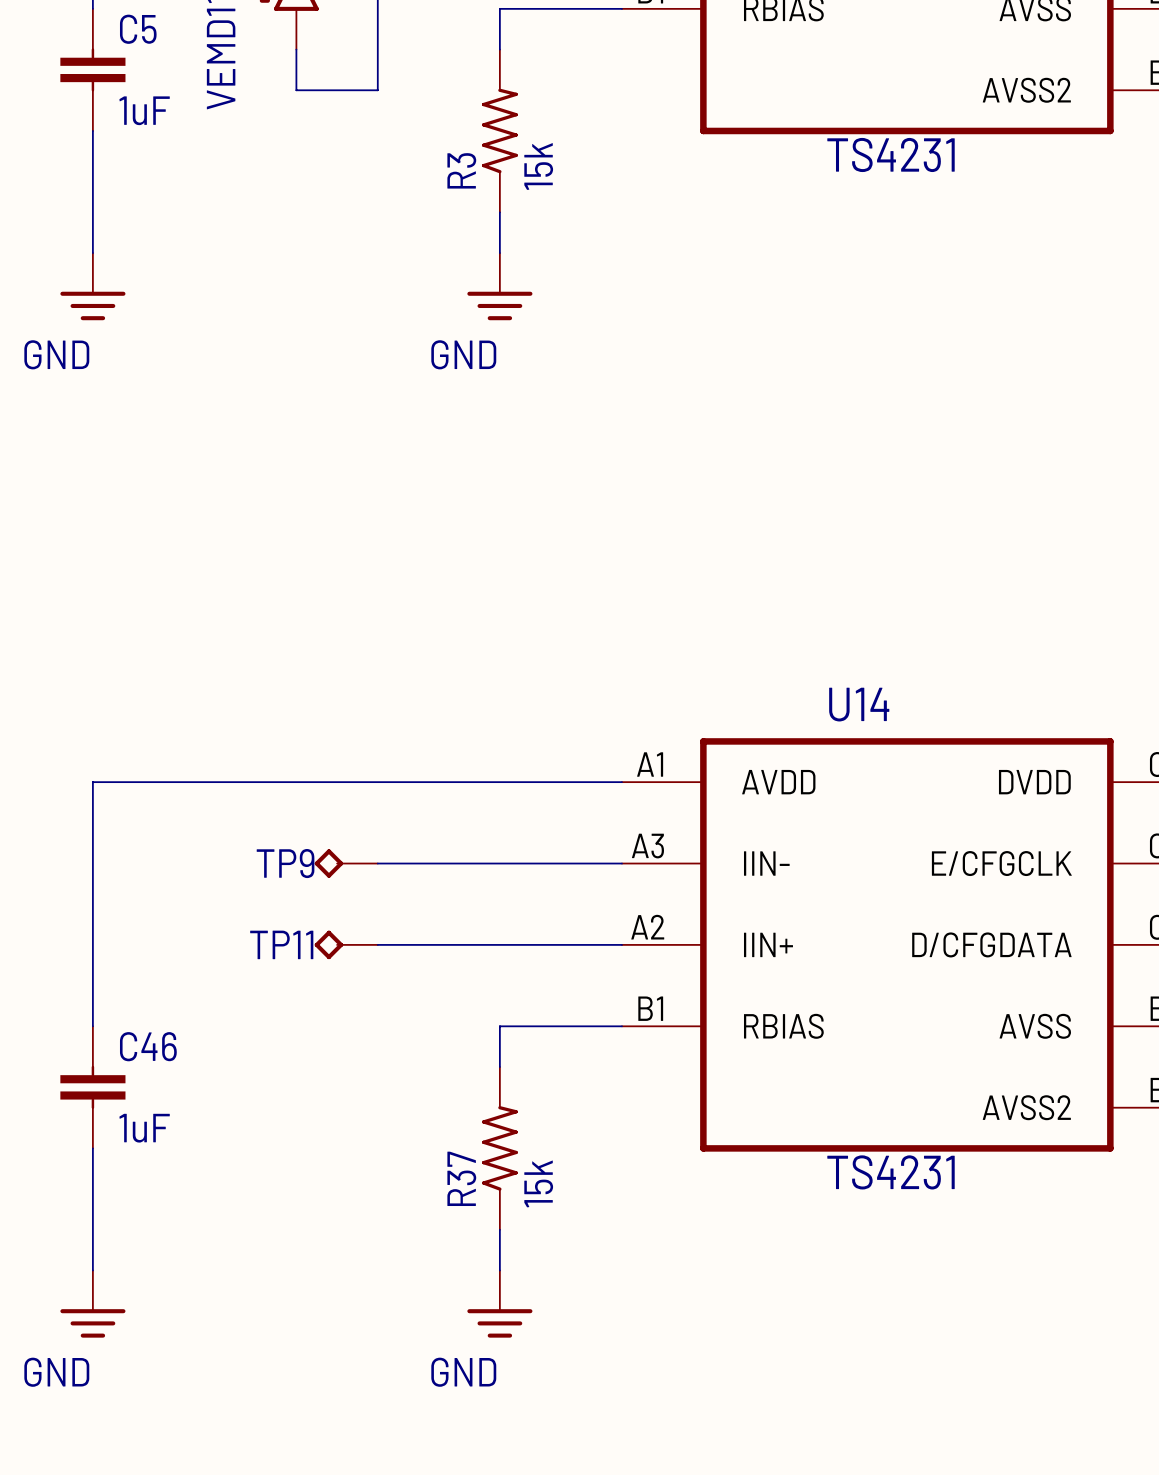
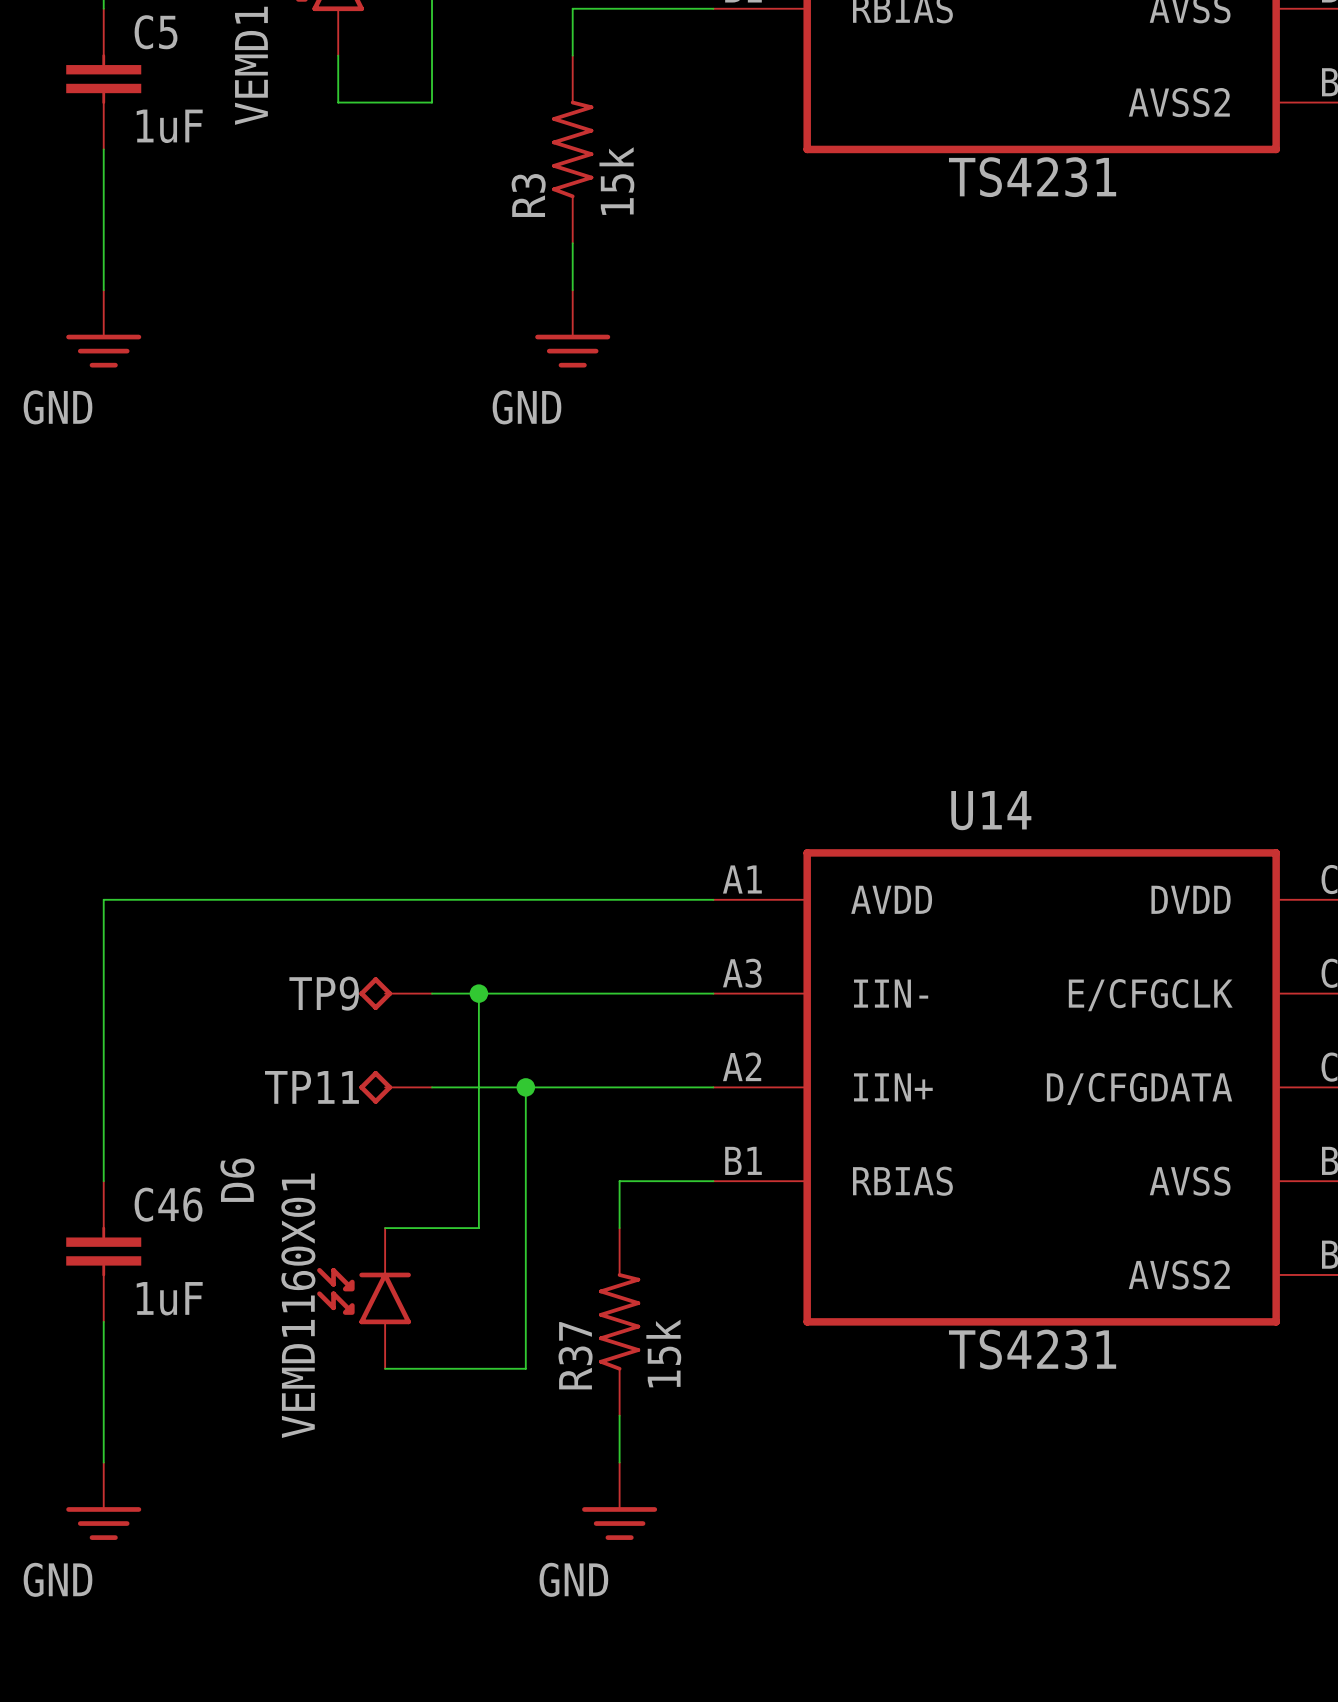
wire: none -> (478, 993) (478, 1228) (385, 1228)
junction: none -> (478, 993)
wire: none -> (525, 1087) (525, 1368) (385, 1368)
junction: none -> (525, 1087)
wire: (540, 1026) (499, 1026) (499, 1067) -> (619, 1181) (619, 1228)
D6: none -> VEMD1160X01 (364, 1298)
R37 position: (499, 1148) -> (619, 1321)
wire: (499, 1229) (499, 1270) -> (619, 1415) (619, 1462)
power symbol position: GND (499, 1304) -> GND (619, 1501)

